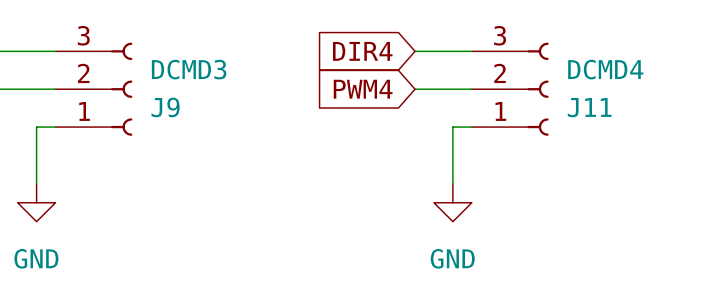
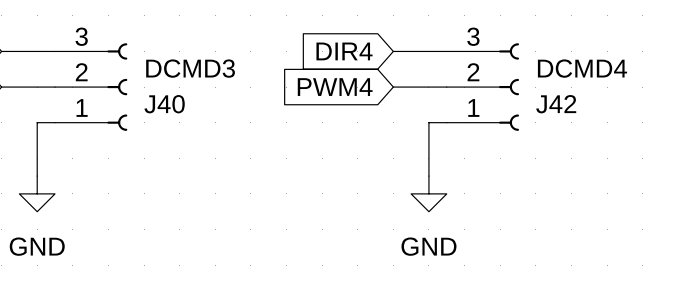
J9 name: J9 (165, 107) -> J40 (164, 104)
J11 name: J11 (589, 107) -> J42 (556, 104)

